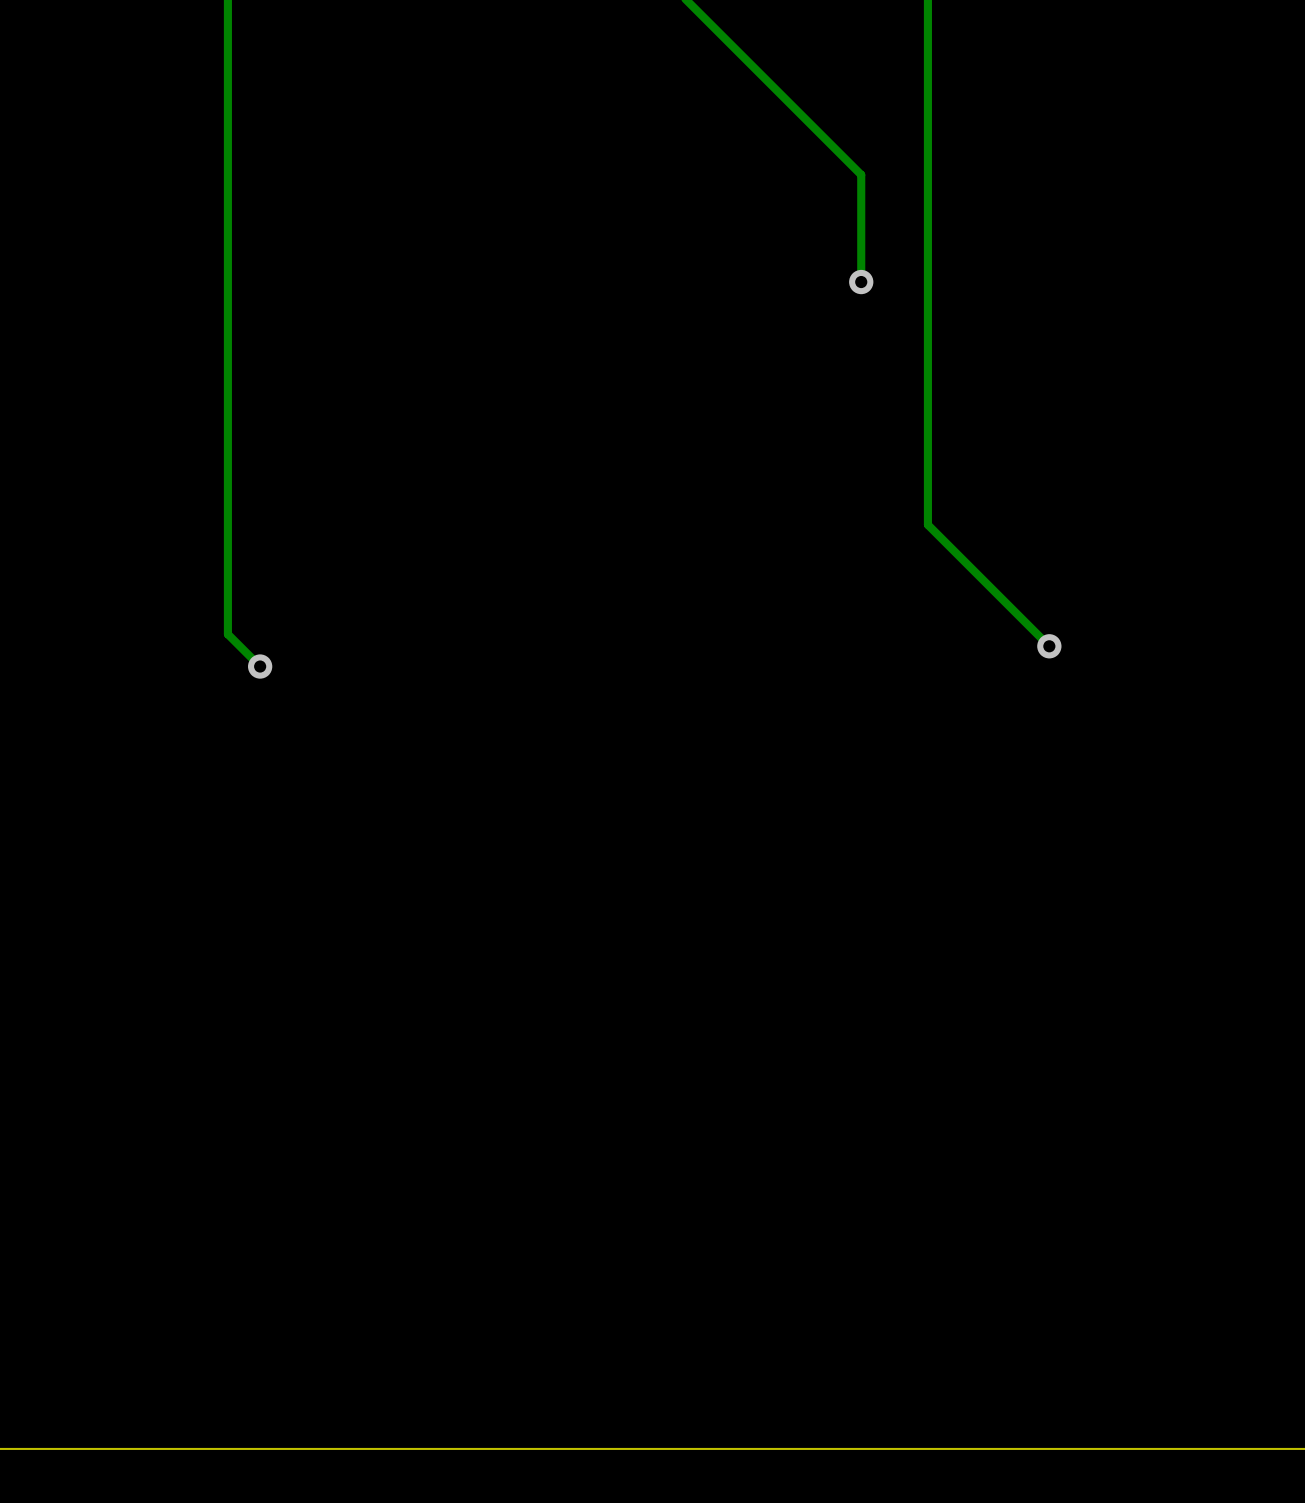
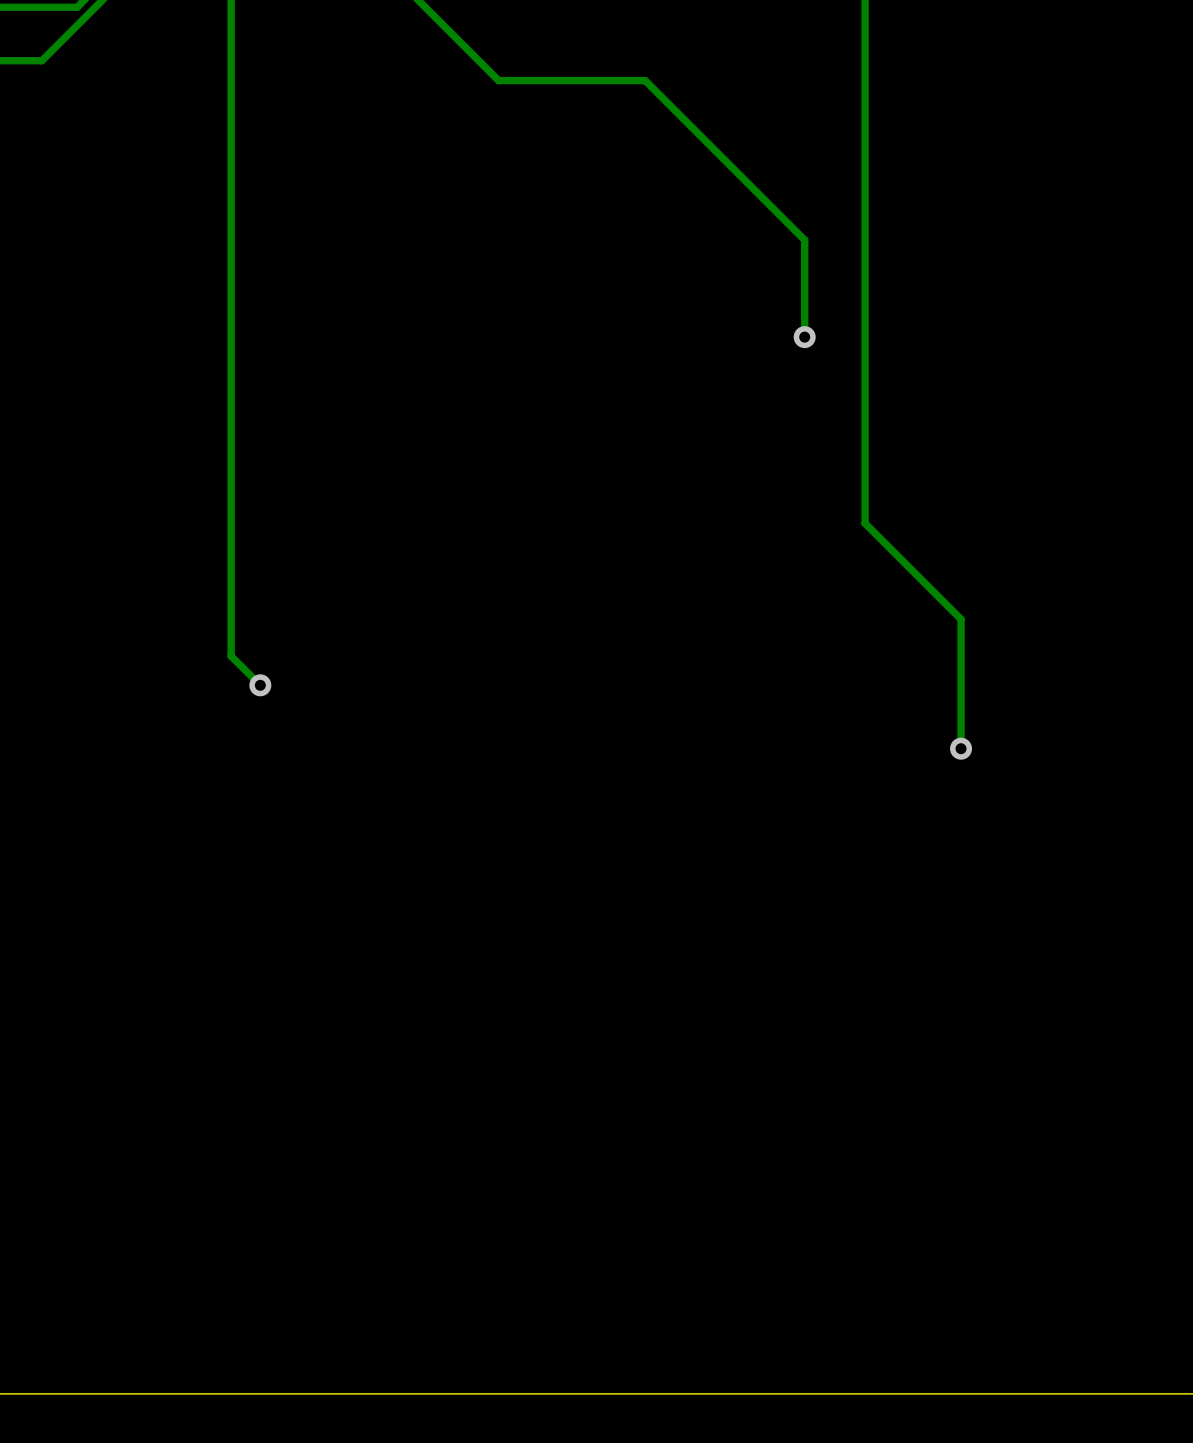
track: (927, 487) (927, 524) (1049, 646) -> (865, 523) (961, 619) (961, 748)
via position: (1049, 646) -> (961, 748)

